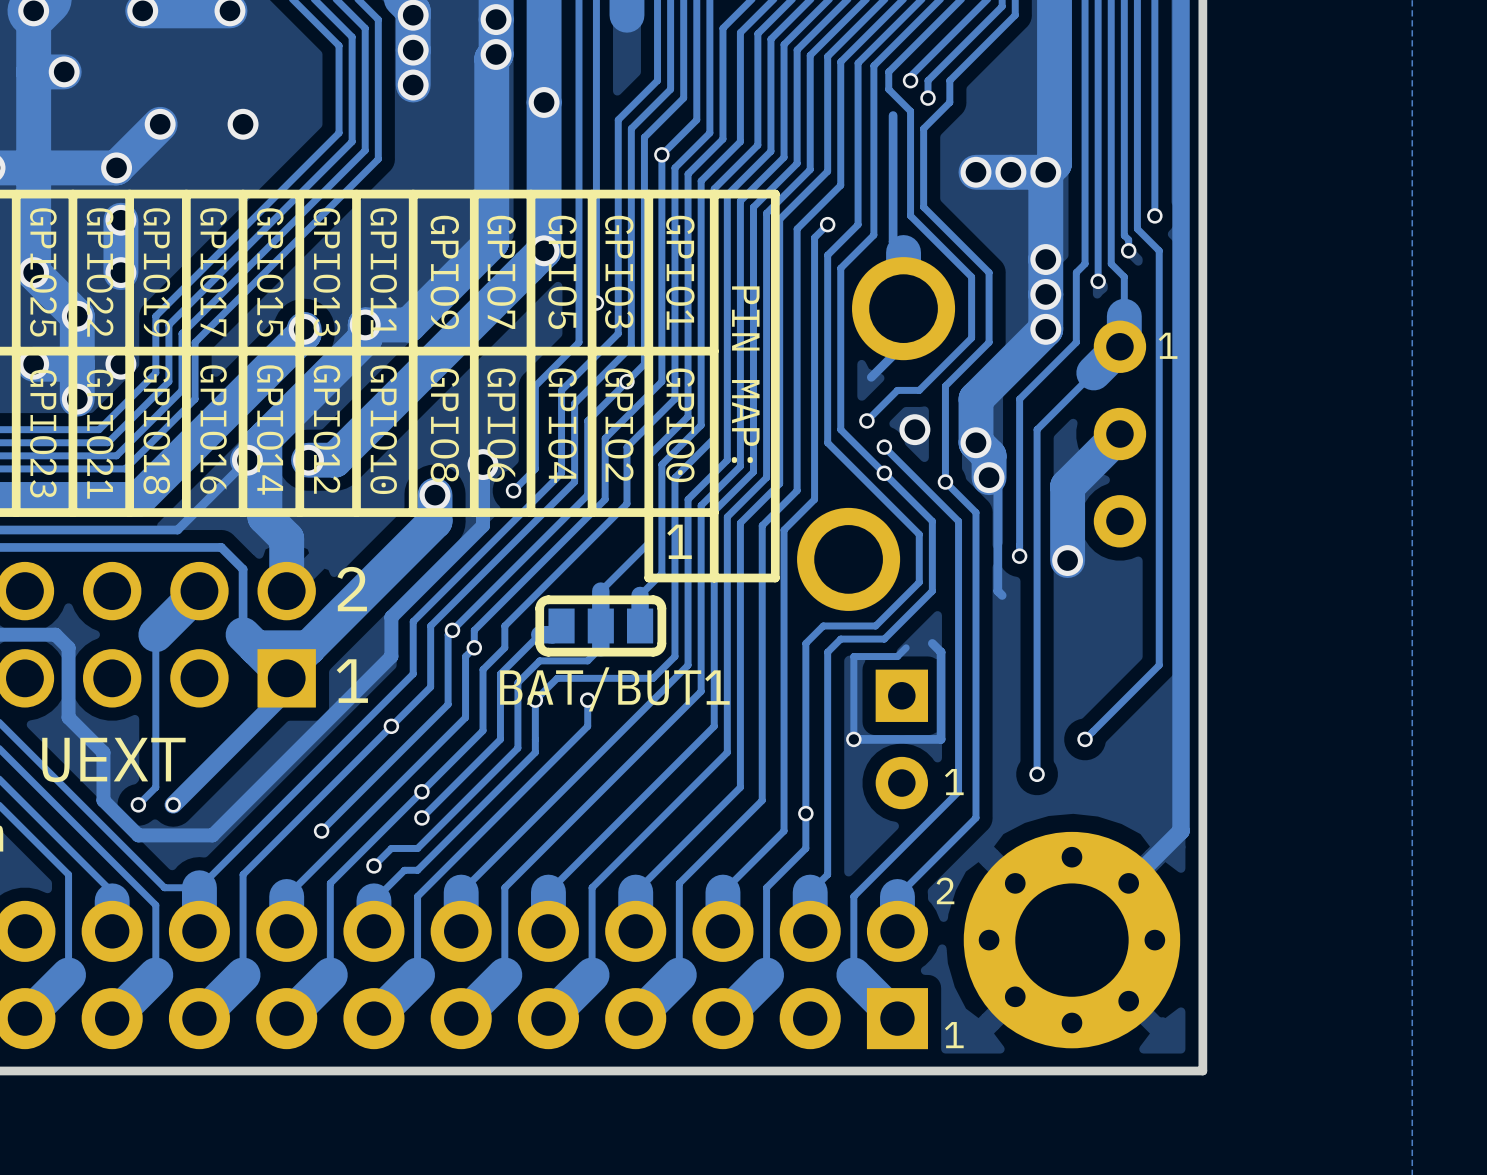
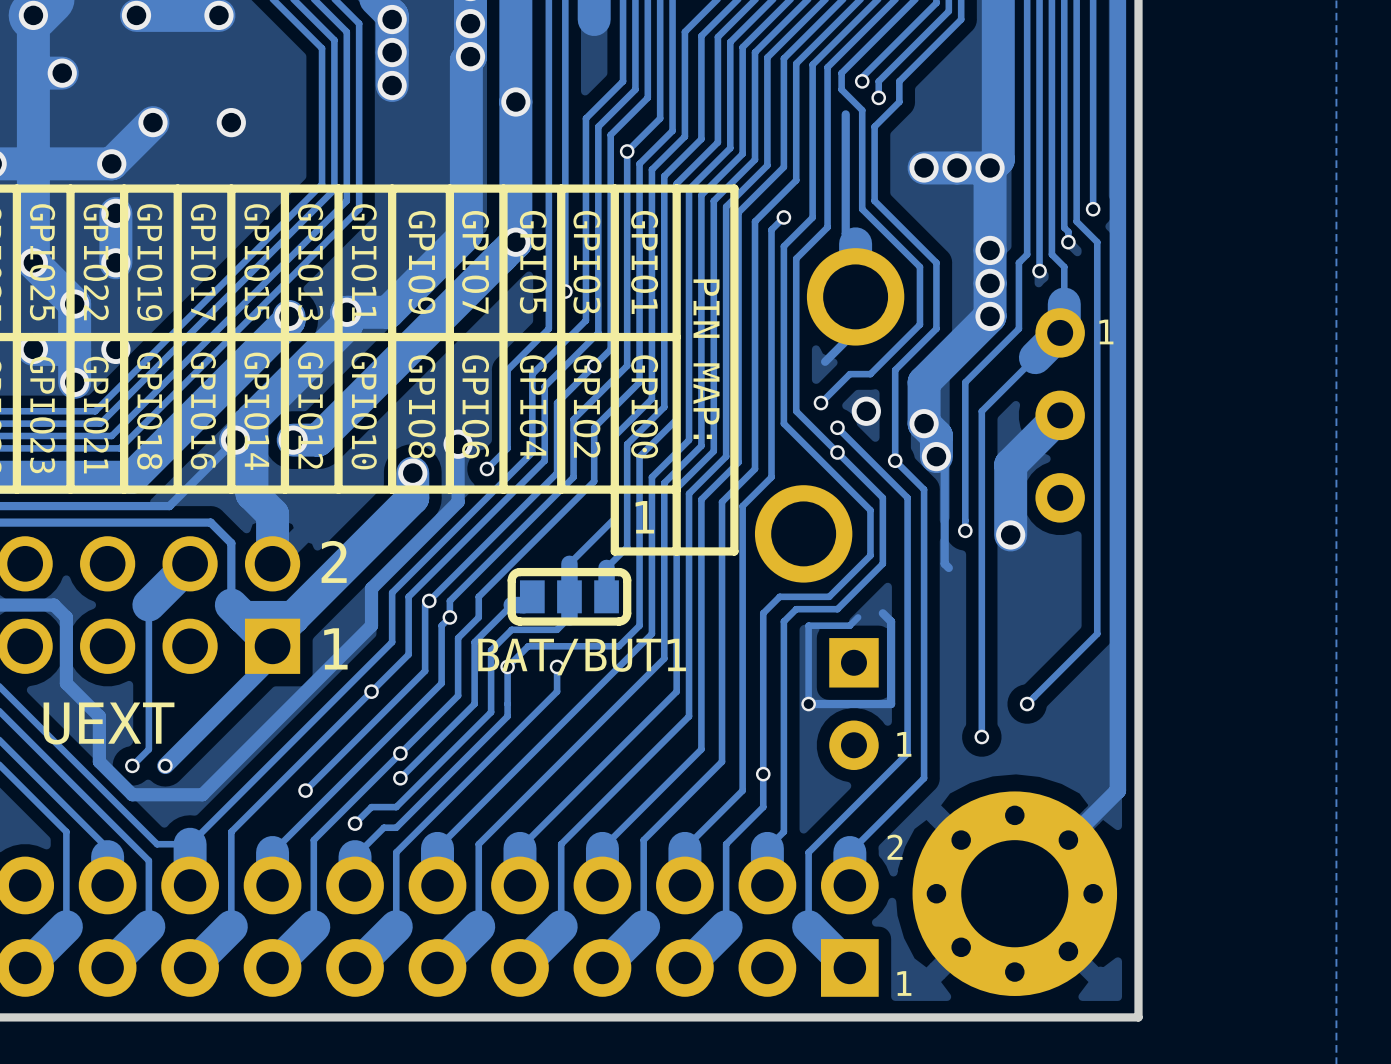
track: (339, 133) (155, 316) (155, 372) -> (322, 130) (322, 184) (148, 357)
track: (352, 141) (168, 324) (168, 381) (107, 442) (104, 442) -> (334, 139) (334, 189) (100, 423)
track: (365, 150) (181, 333) (181, 390) -> (346, 147) (346, 200) (173, 374)
track: (378, 159) (195, 342) (195, 399) -> (359, 155) (359, 209) (185, 382)

